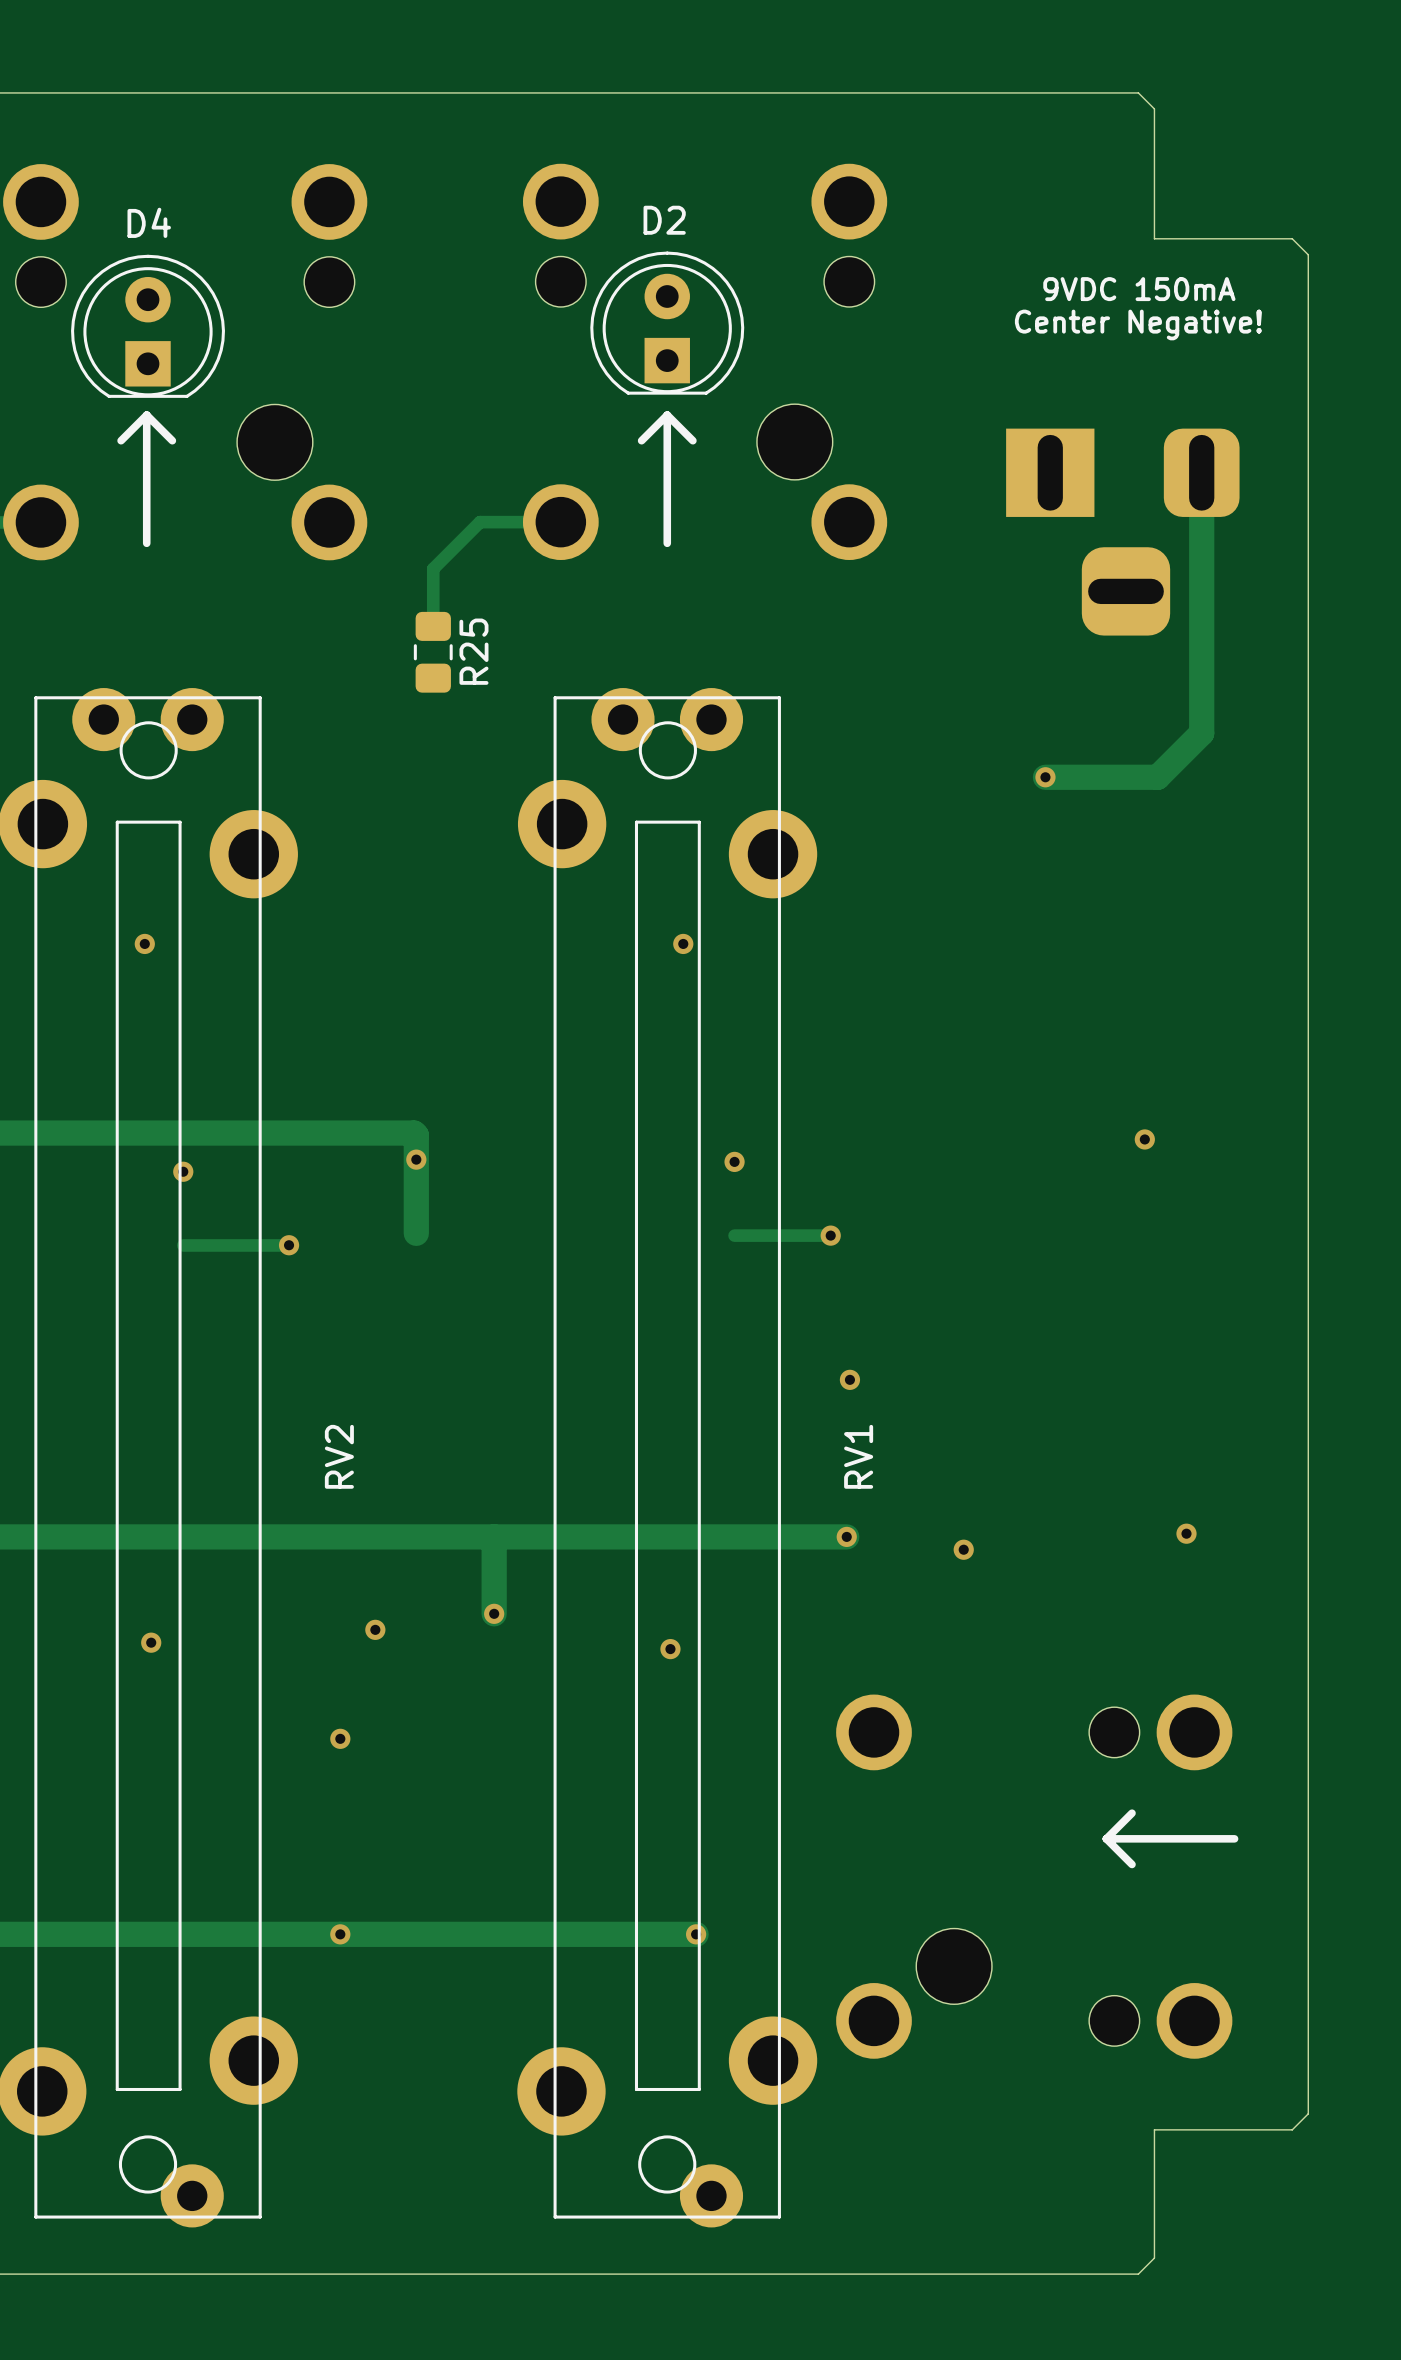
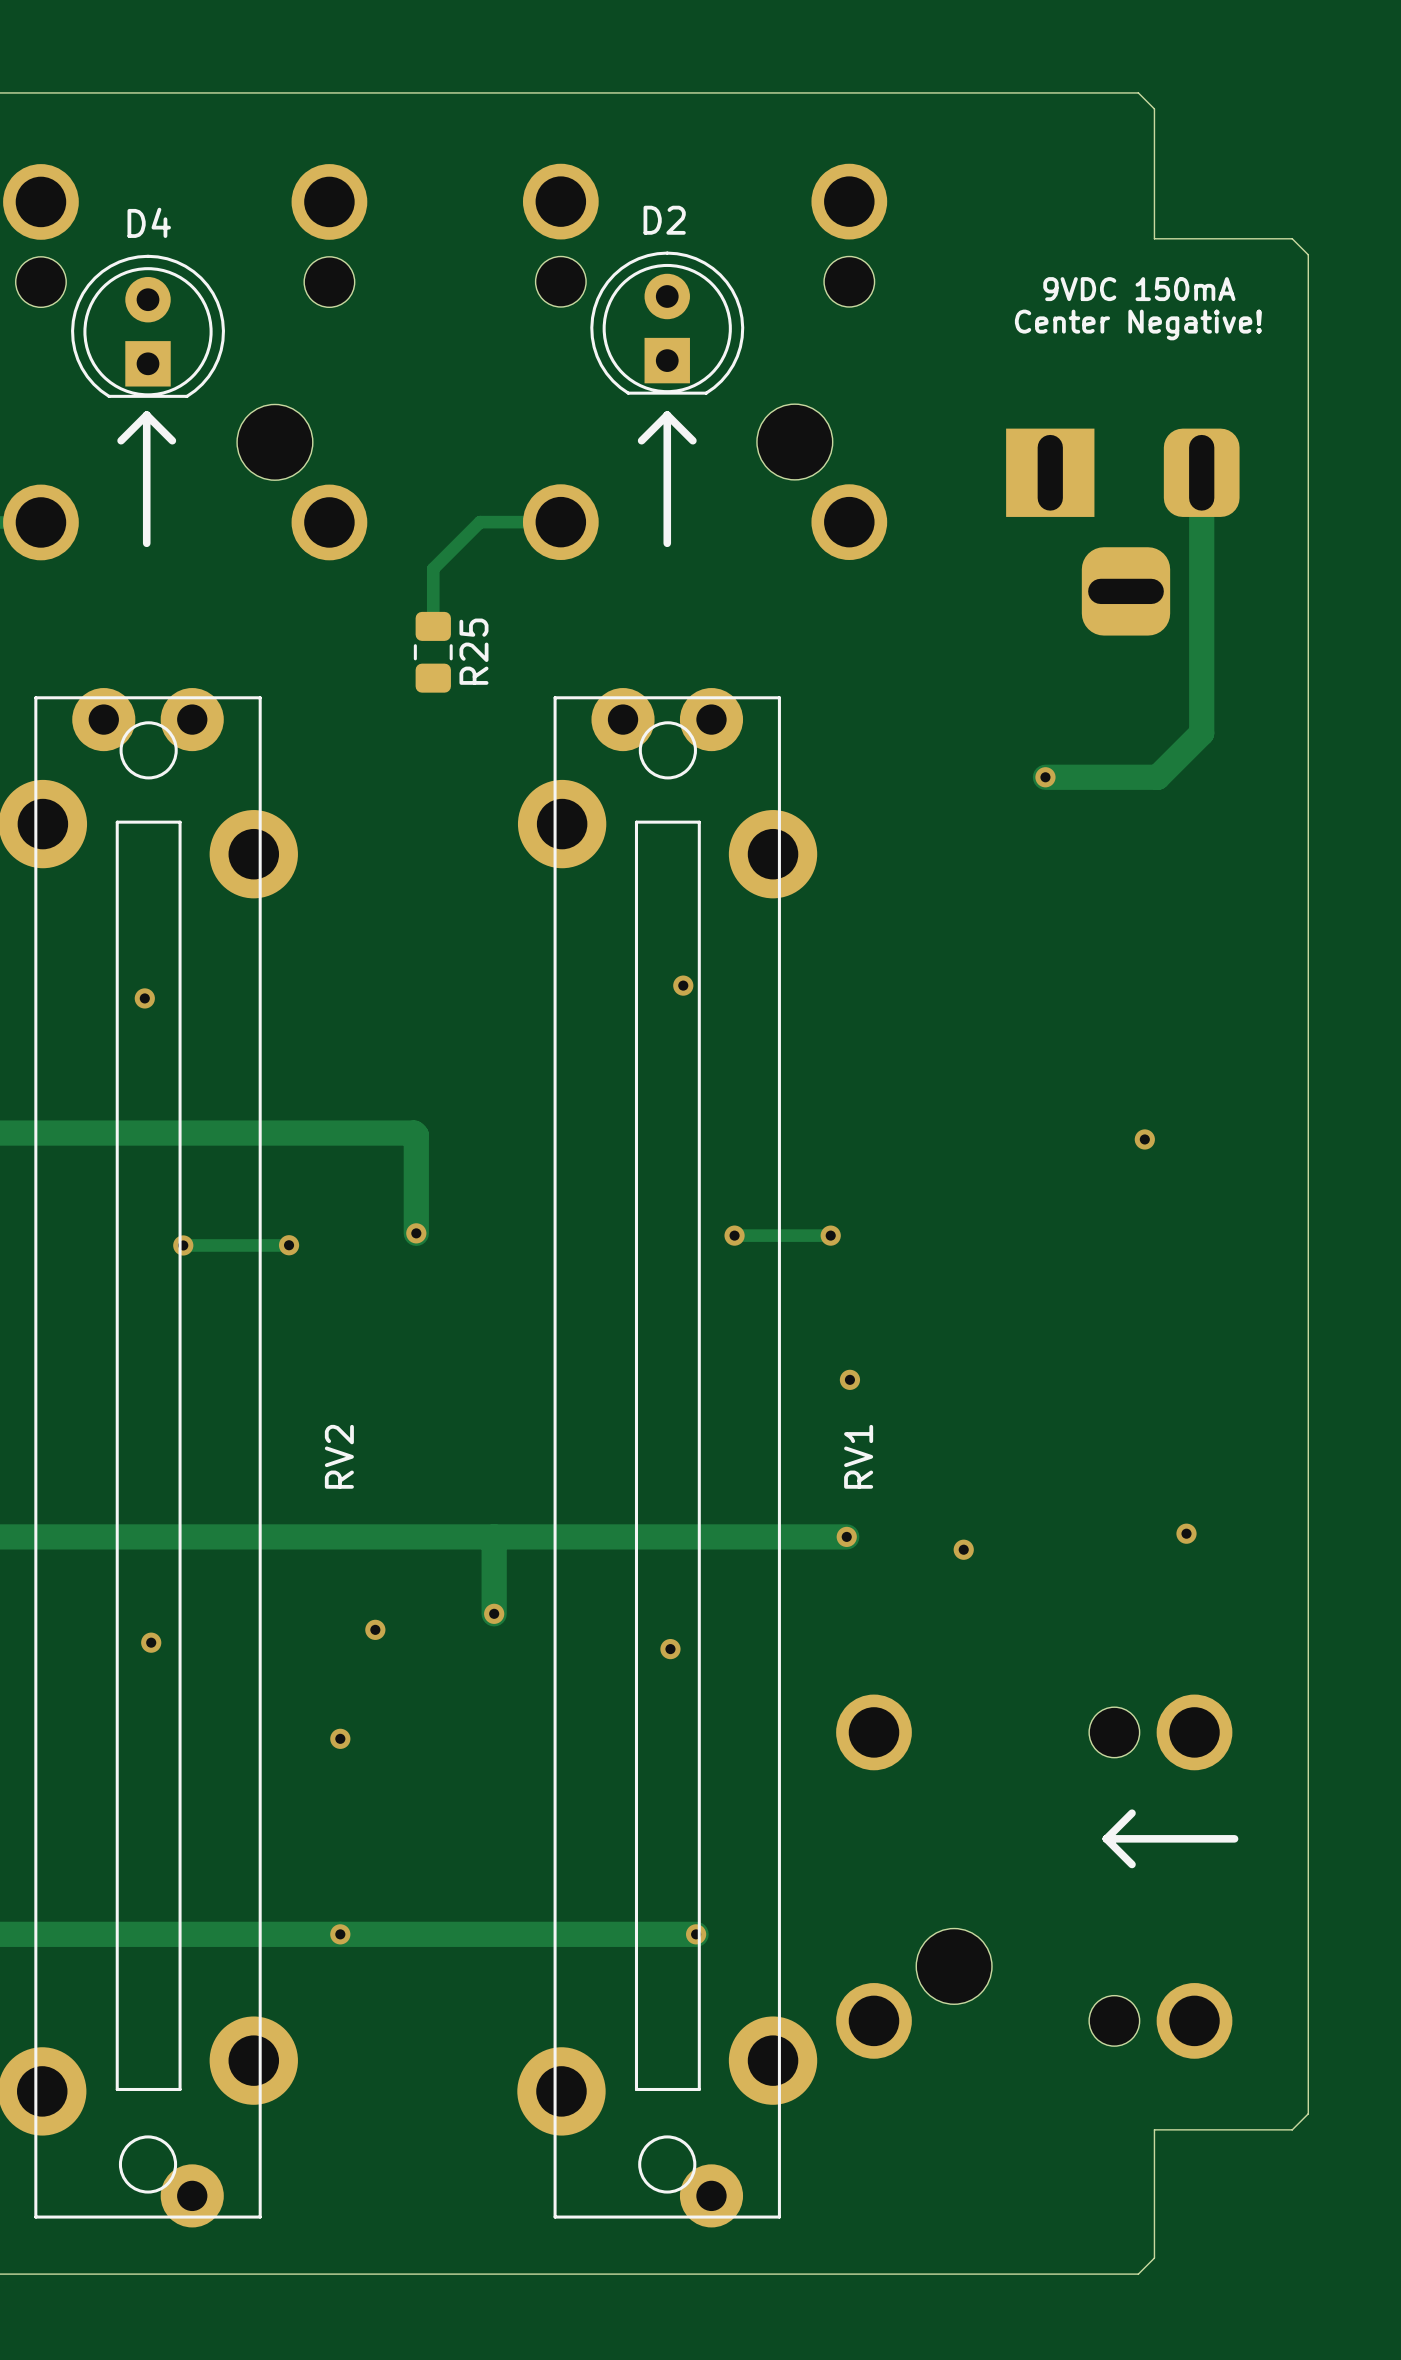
via position: (144, 943) -> (144, 998)
via position: (683, 943) -> (683, 985)
via position: (416, 1159) -> (416, 1233)
via position: (734, 1161) -> (734, 1235)
via position: (183, 1171) -> (183, 1245)

